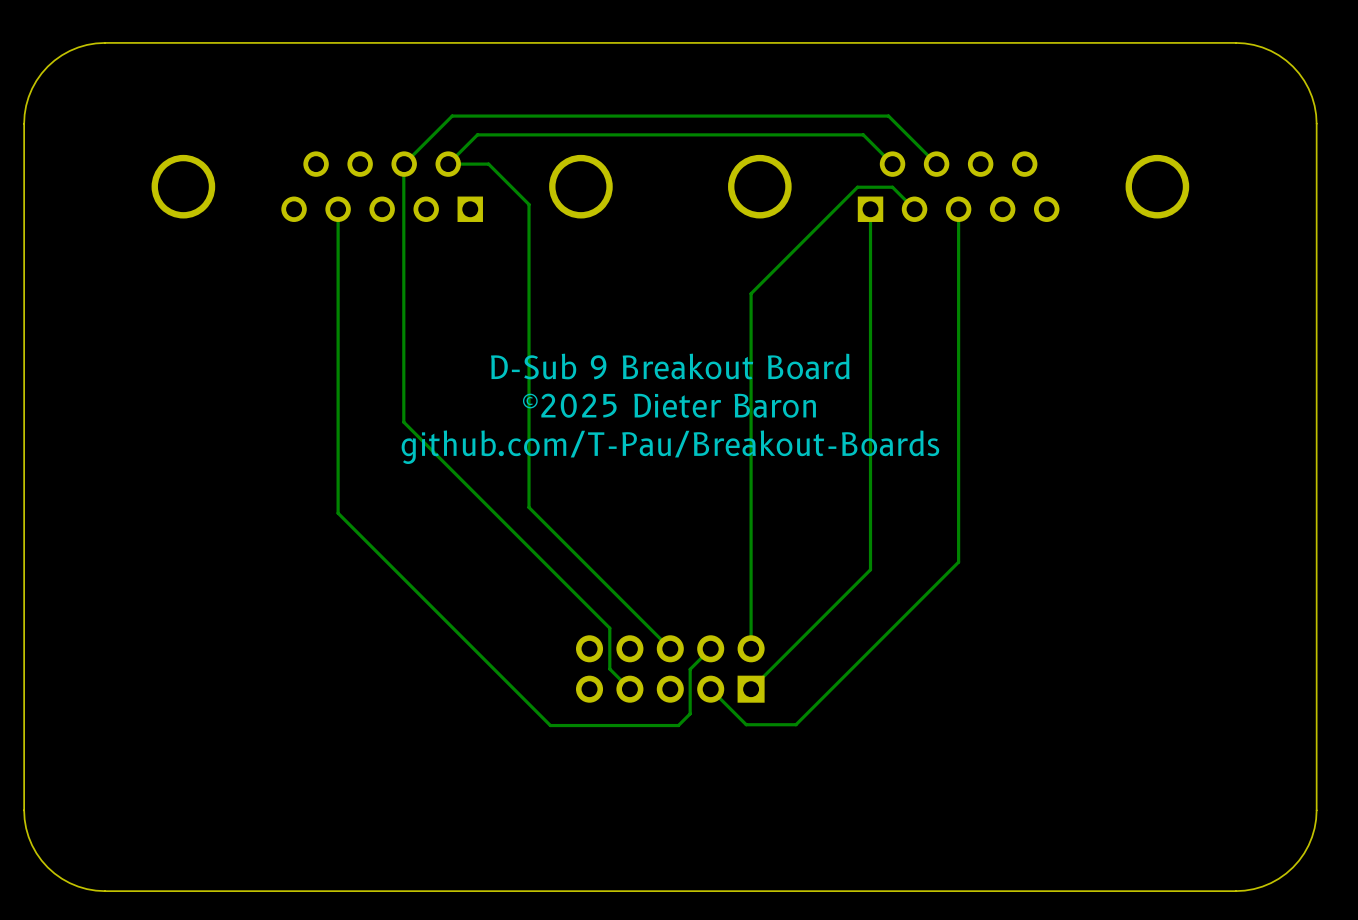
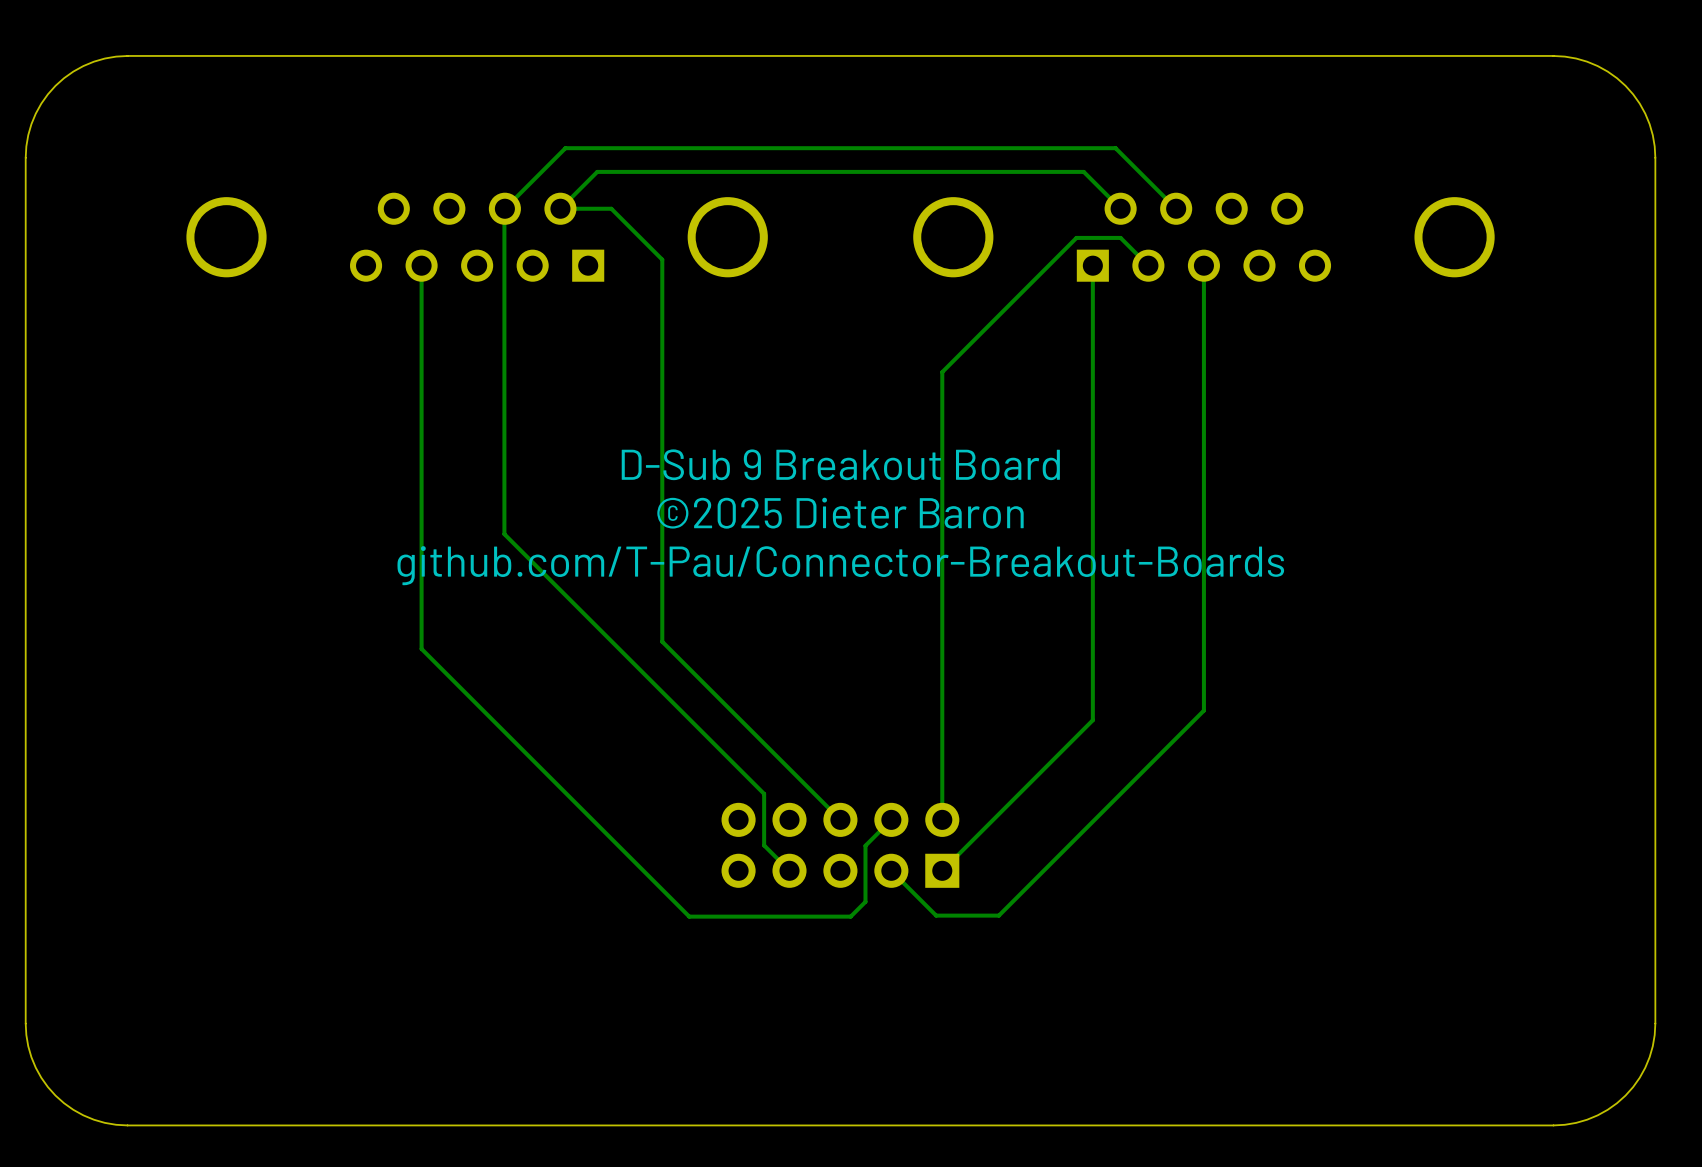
text: github.com/T-Pau/Breakout-Boards (670, 447) -> github.com/T-Pau/Connector-Breakout-Boards (840, 565)

